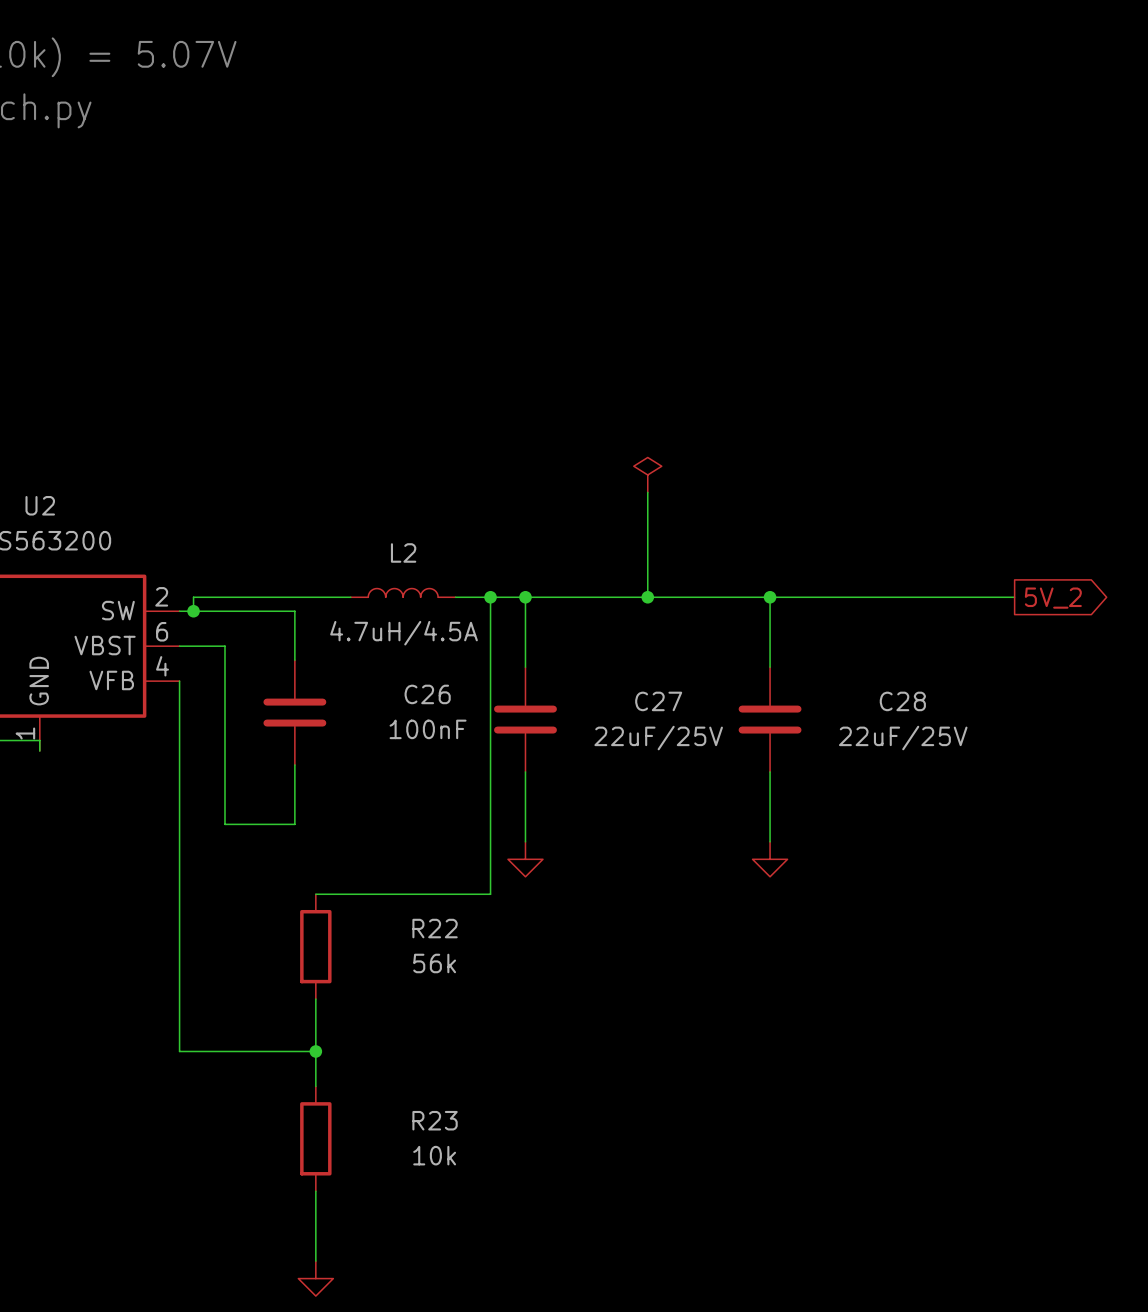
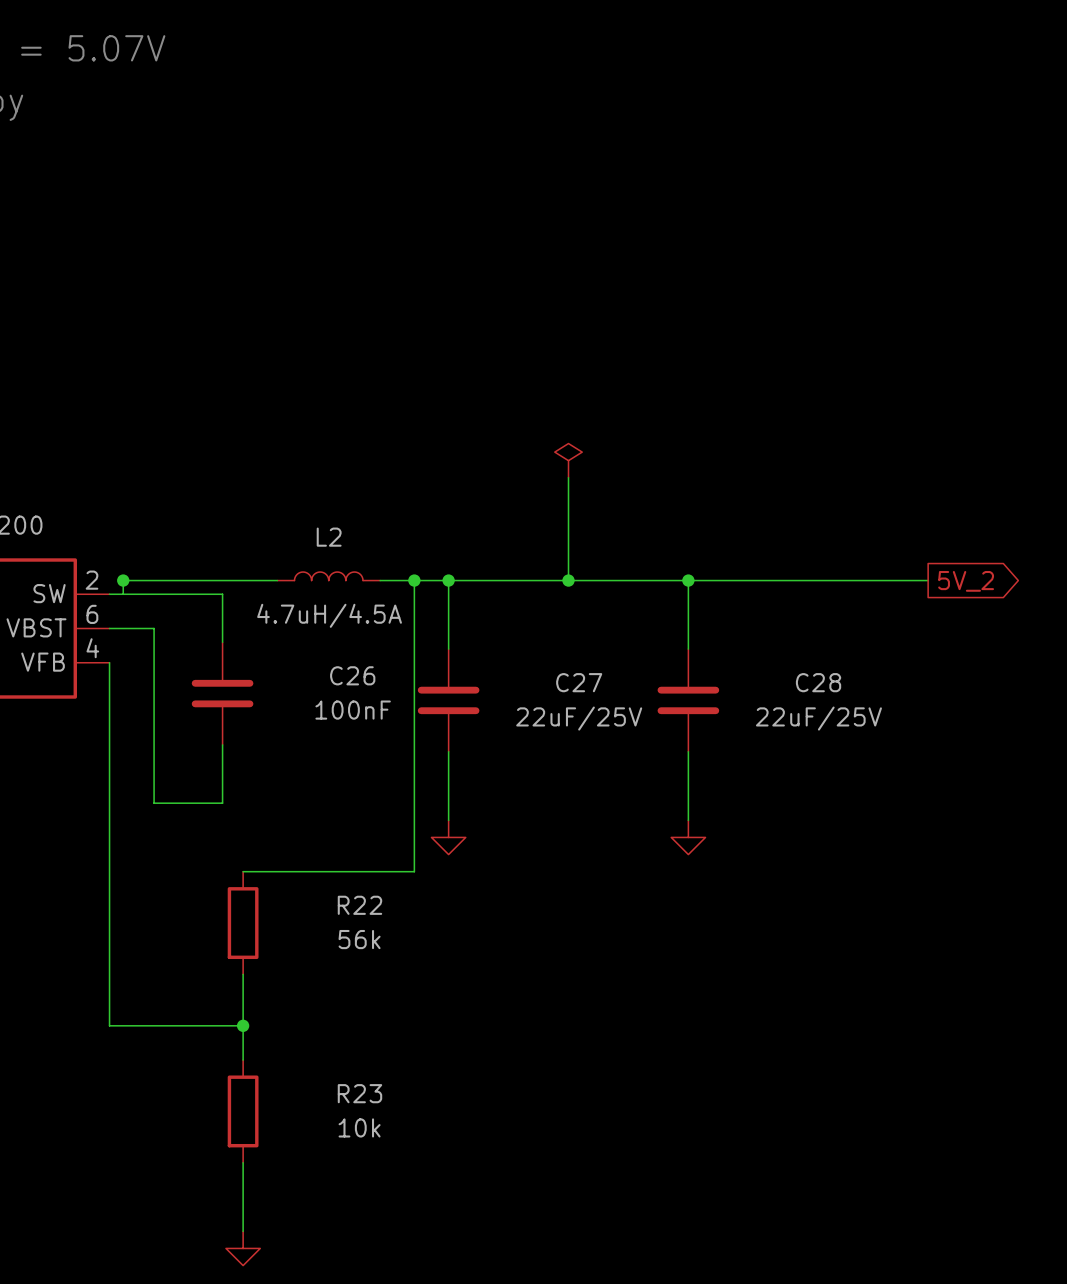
junction position: (193, 611) -> (123, 580)

